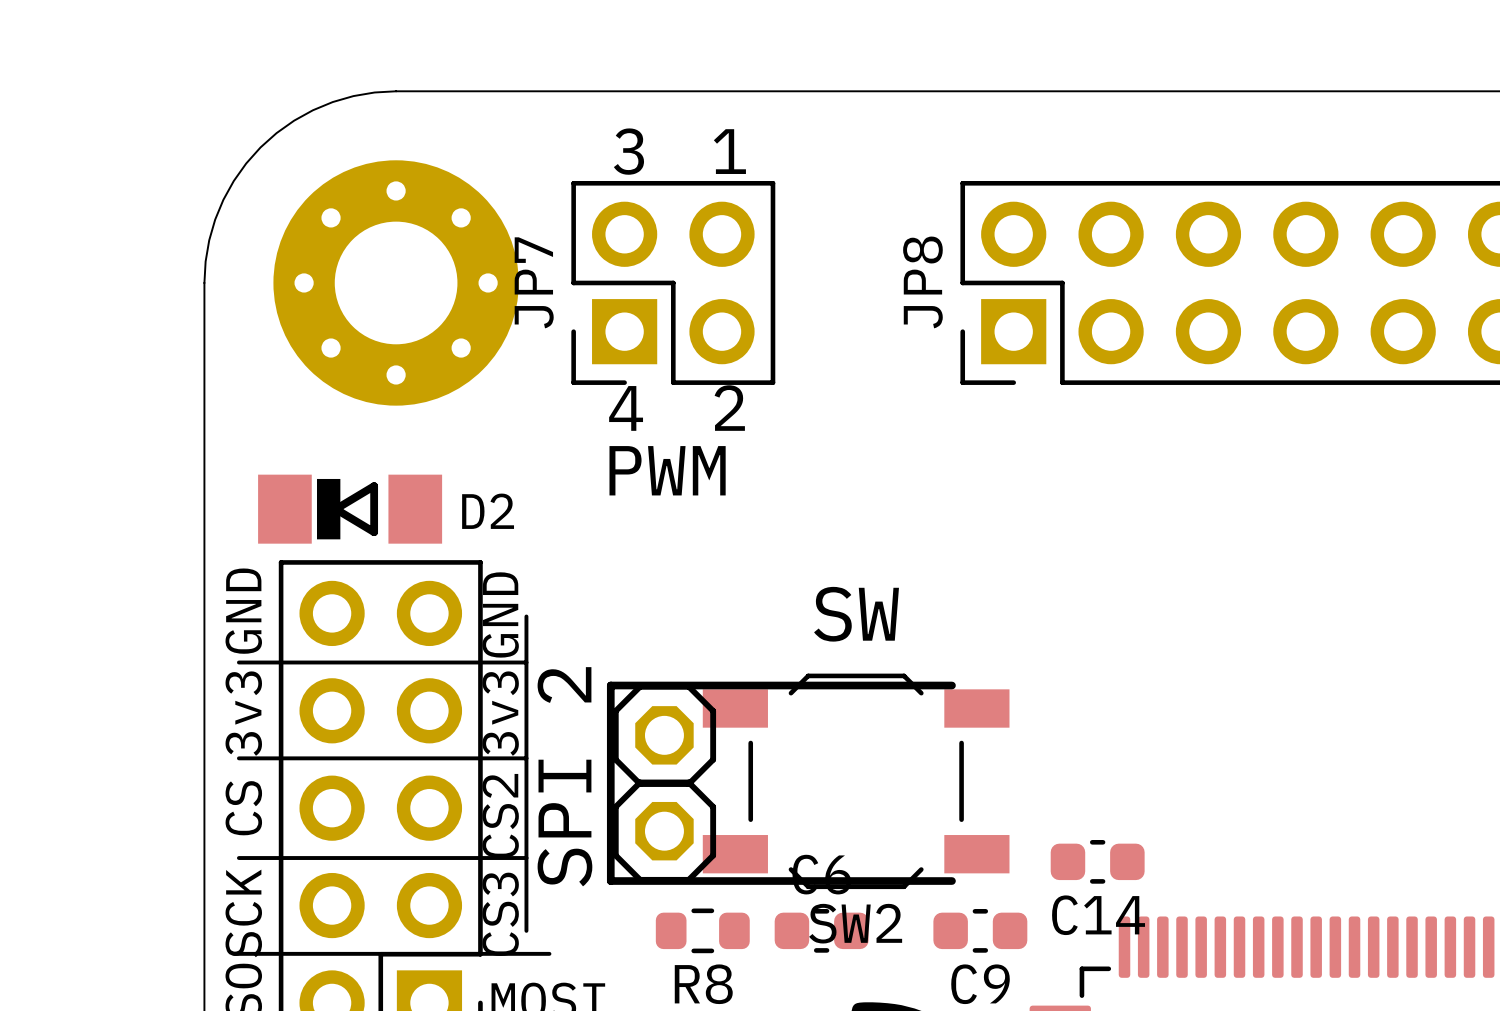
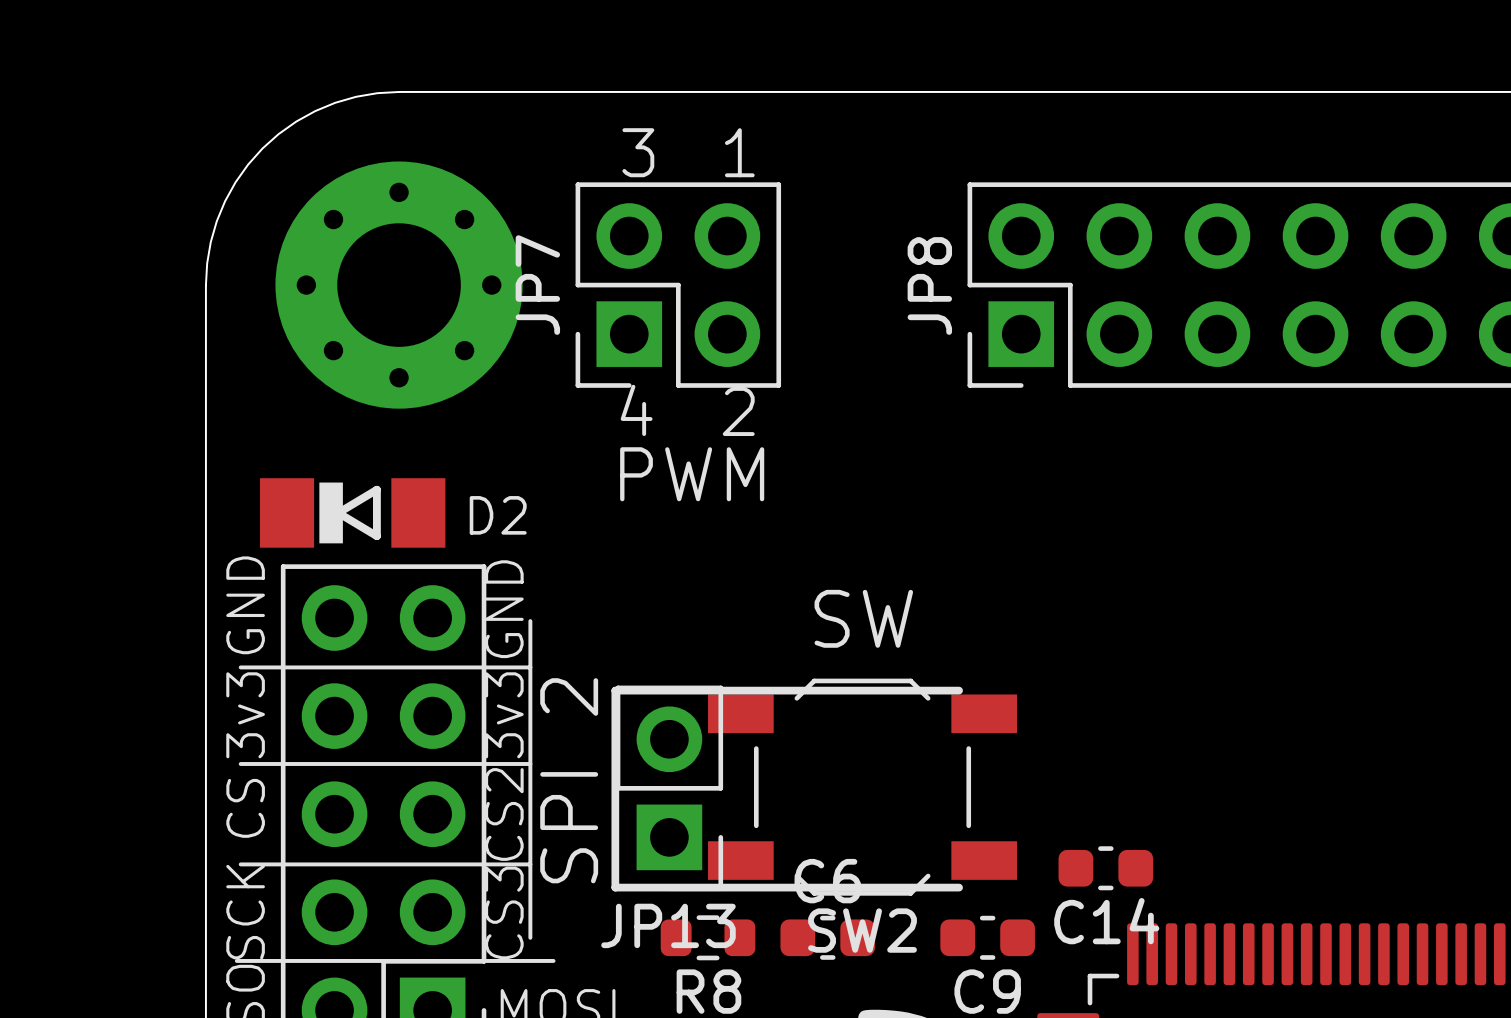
part: (664, 735) -> none
JP13: none -> (669, 788)
part: (664, 831) -> none

